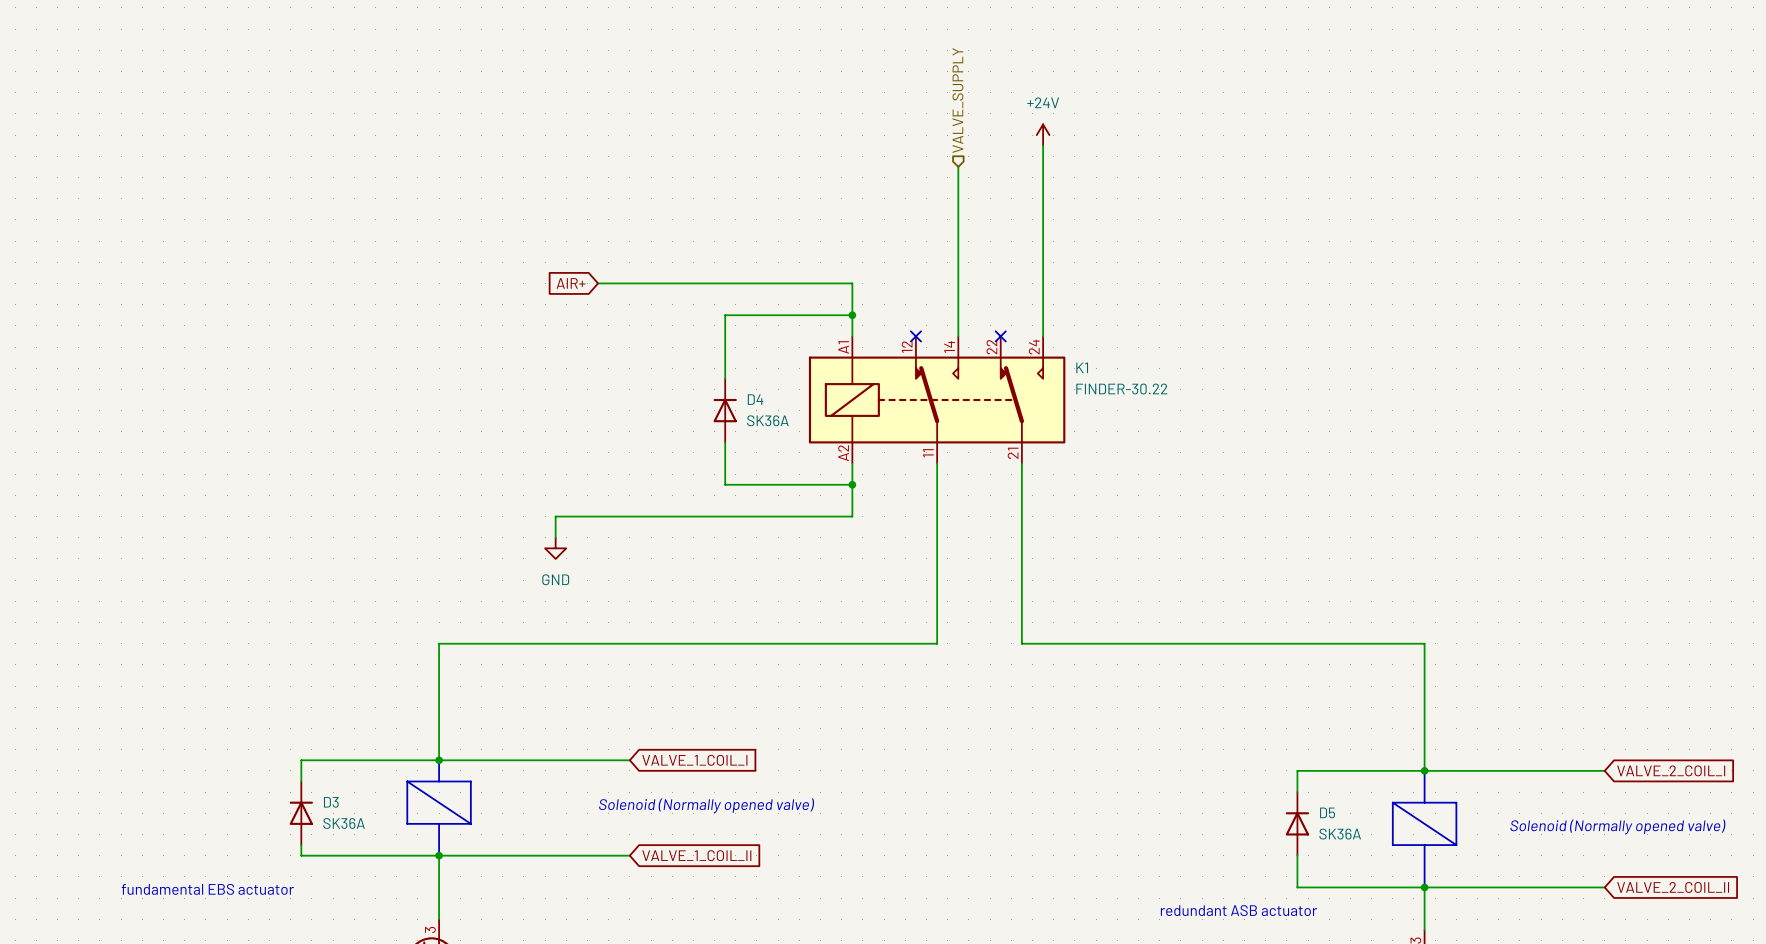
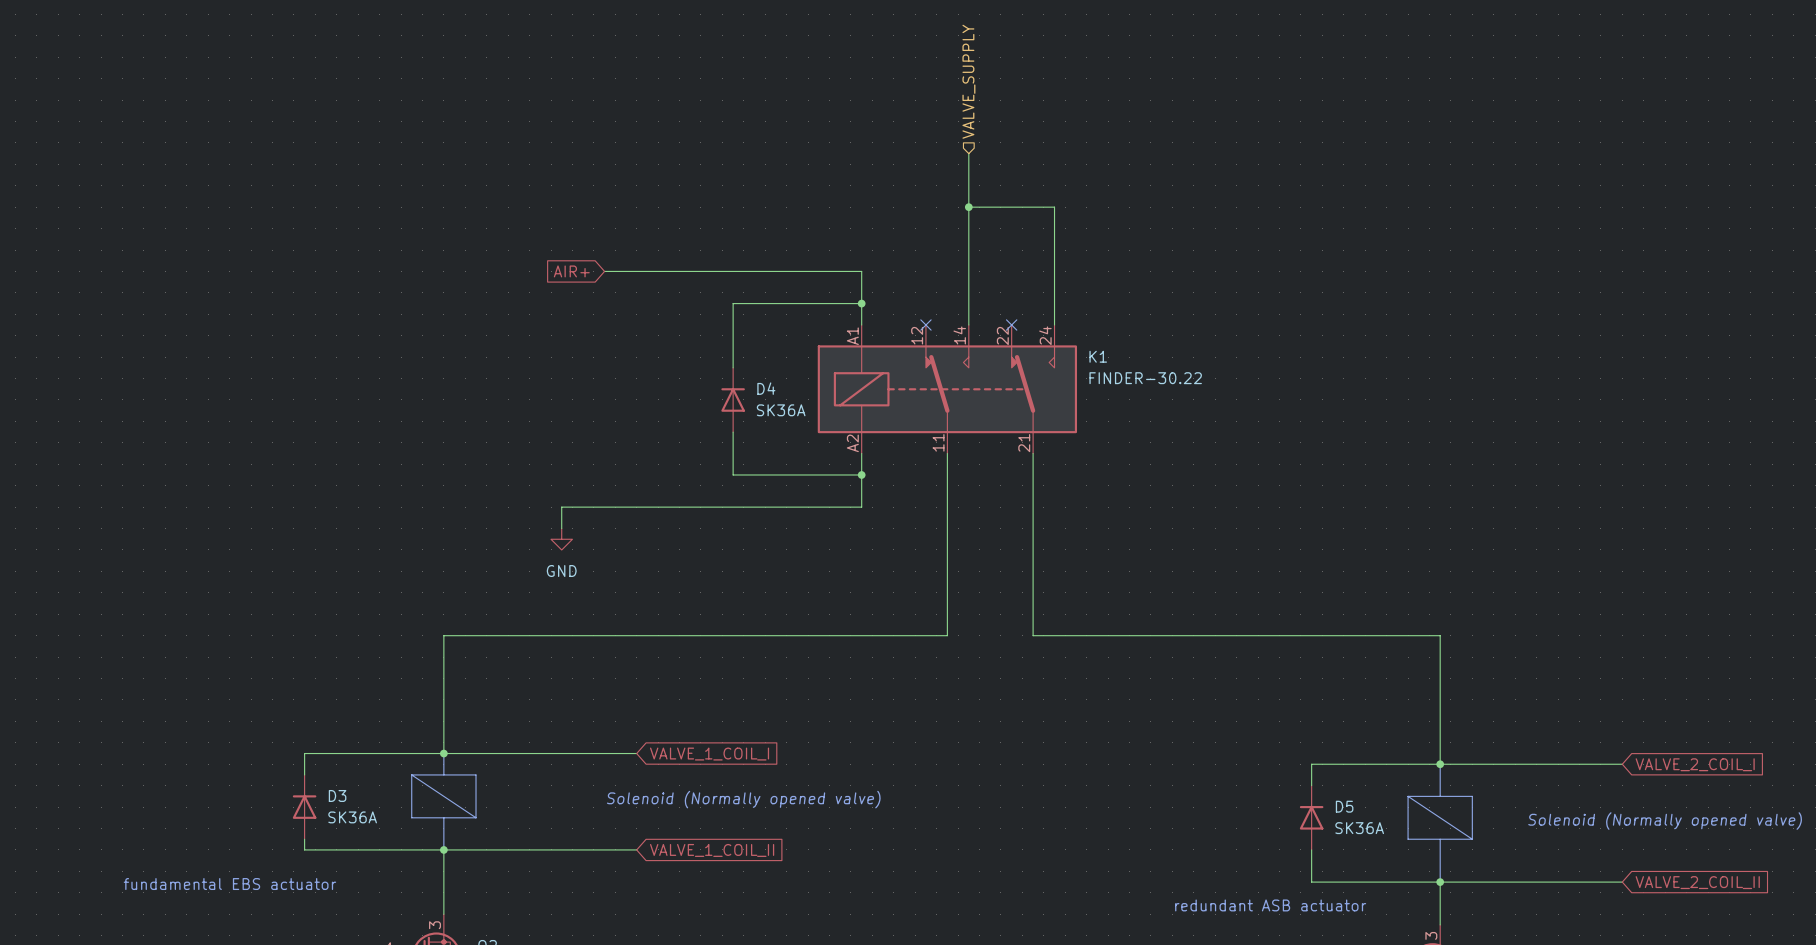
power symbol: +24V (1043, 135) -> none
wire: (1043, 145) (1043, 219) -> (968, 207) (1054, 207)
junction: none -> (968, 207)

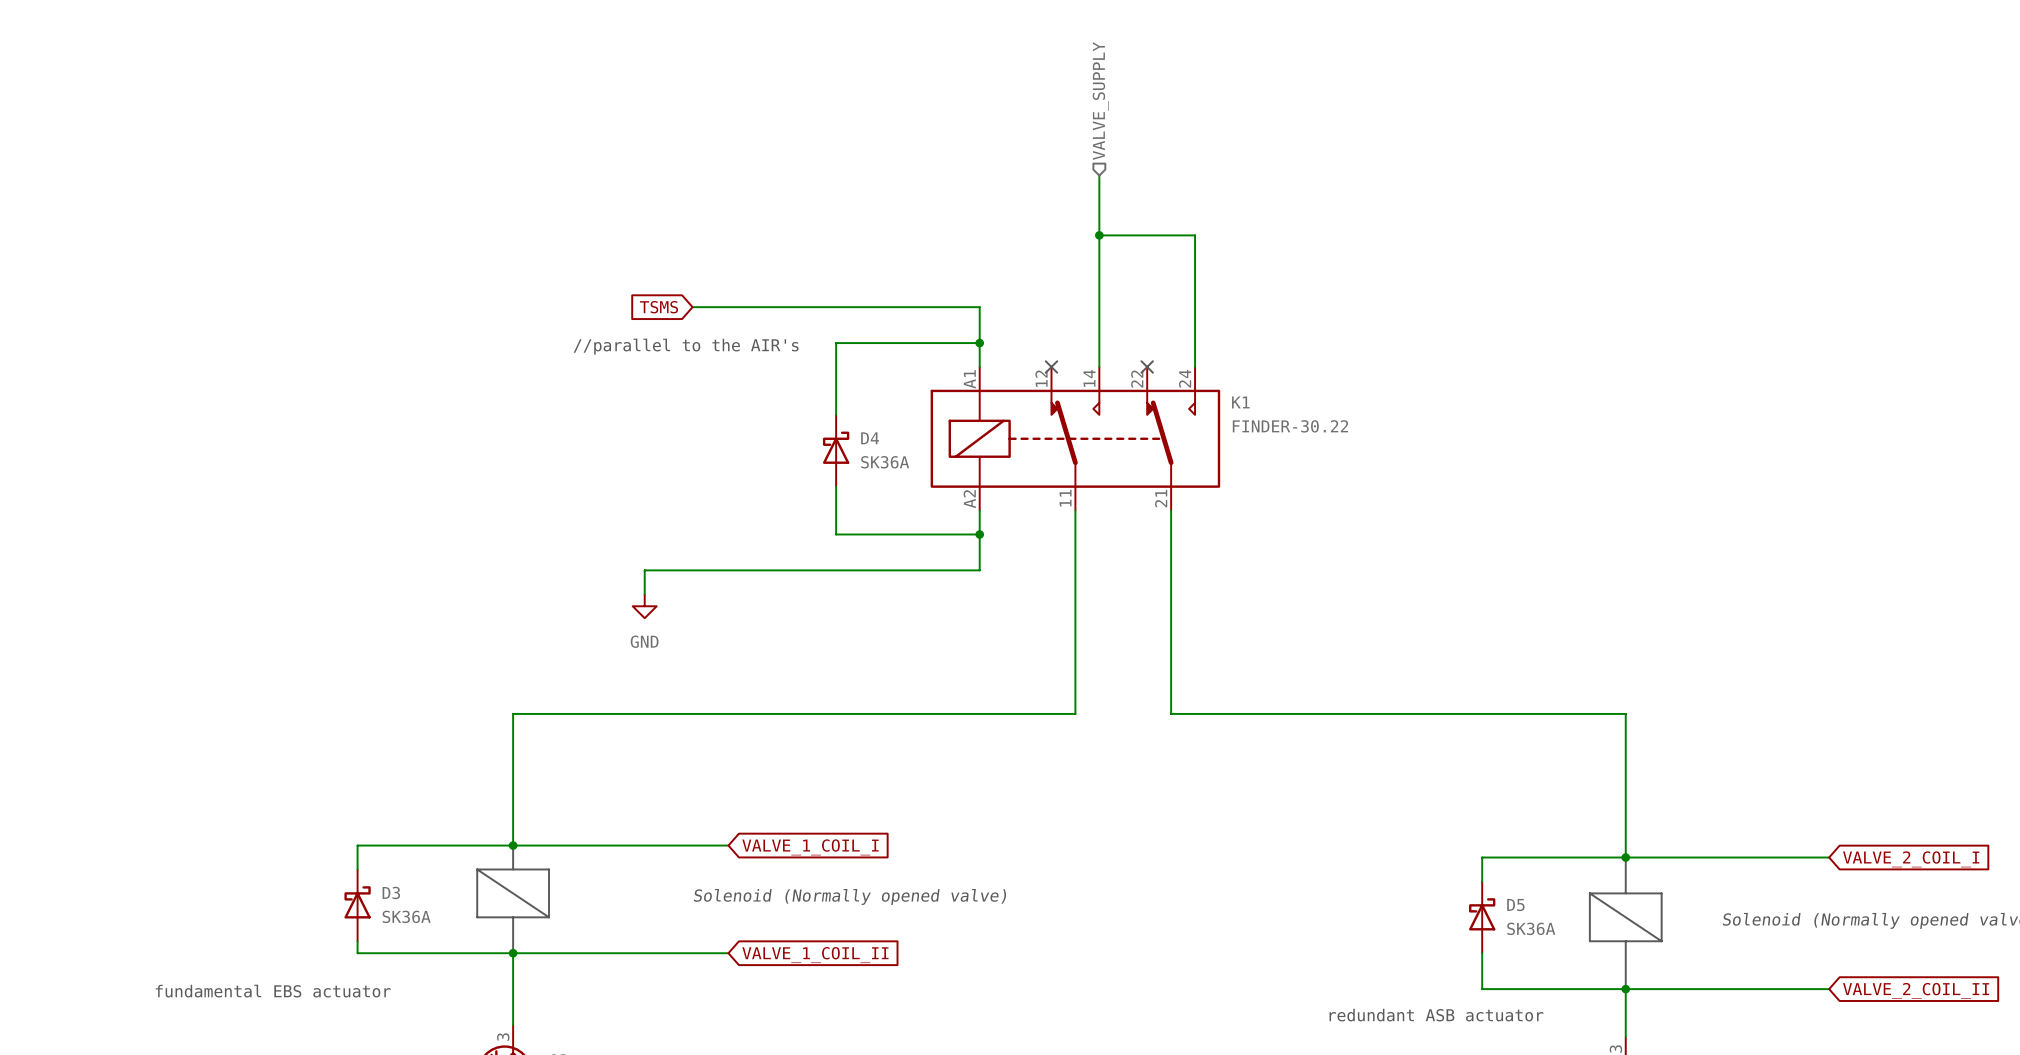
global label: AIR+ (571, 271) -> TSMS (659, 307)
text: none -> //parallel to the AIR's (686, 346)
D4 symbol: [721, 367, 745, 433] -> [822, 414, 850, 487]
D3 symbol: [292, 774, 317, 840] -> [344, 869, 371, 942]
D5 symbol: [1299, 785, 1324, 850] -> [1469, 881, 1496, 954]

